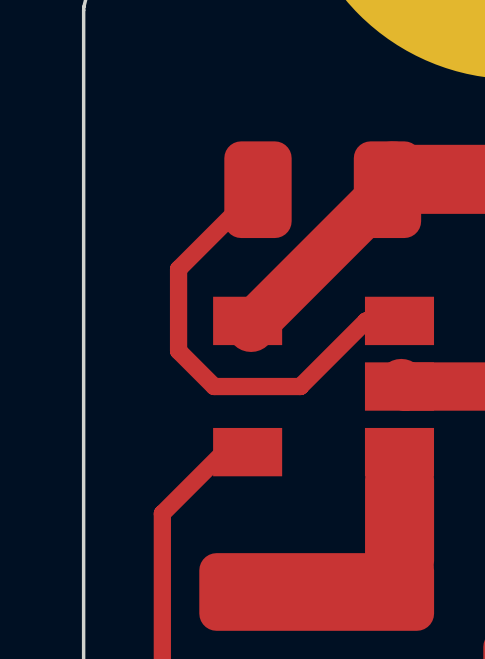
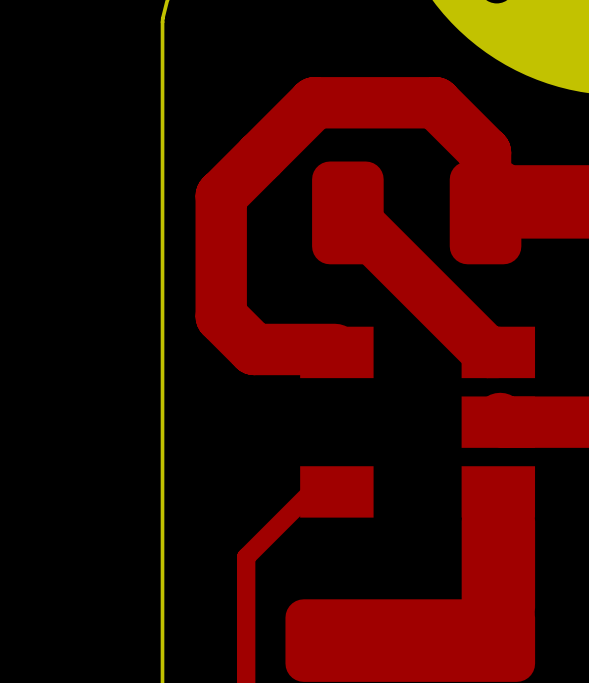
top track: (257, 189) (178, 269) (178, 350) (214, 386) (300, 386) (365, 320) (380, 320) -> none
top track: (387, 189) (251, 327) -> (485, 212) (485, 152) (435, 102) (314, 102) (221, 196) (221, 316) (254, 349) (335, 349)
top track: none -> (354, 223) (358, 223) (487, 352) (498, 352)

